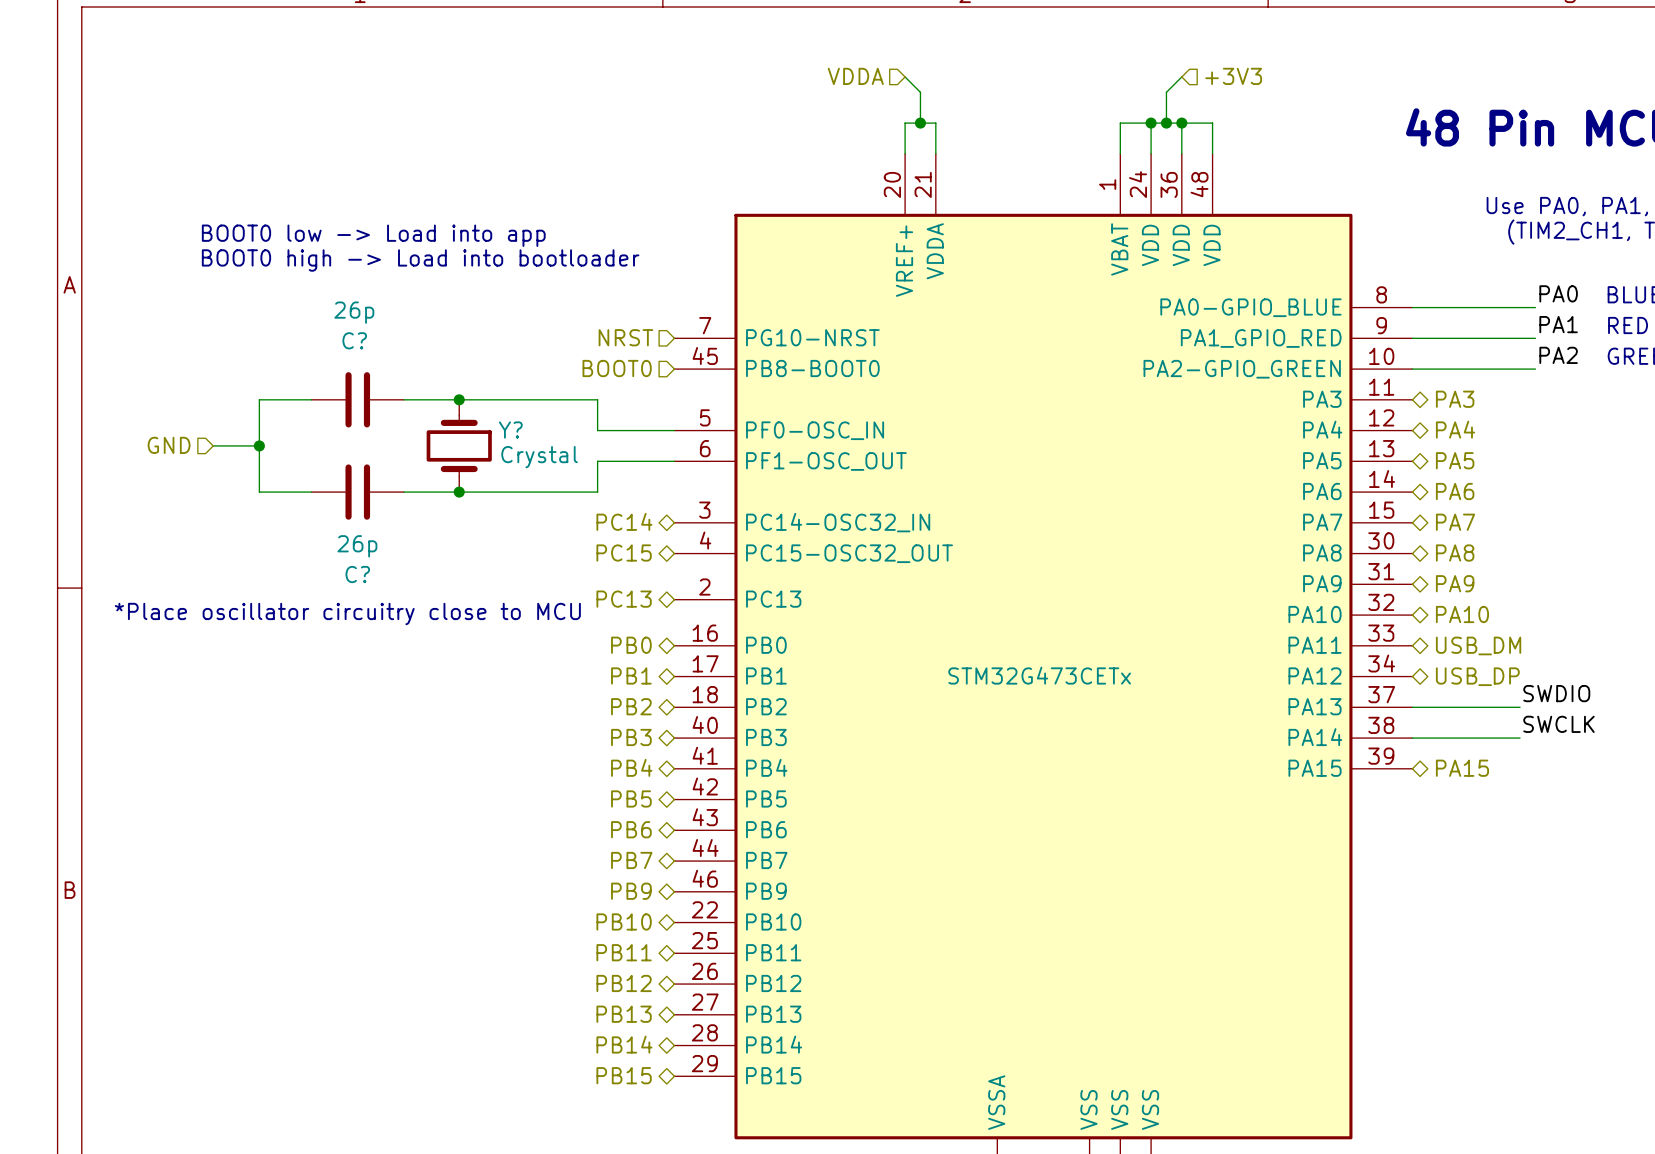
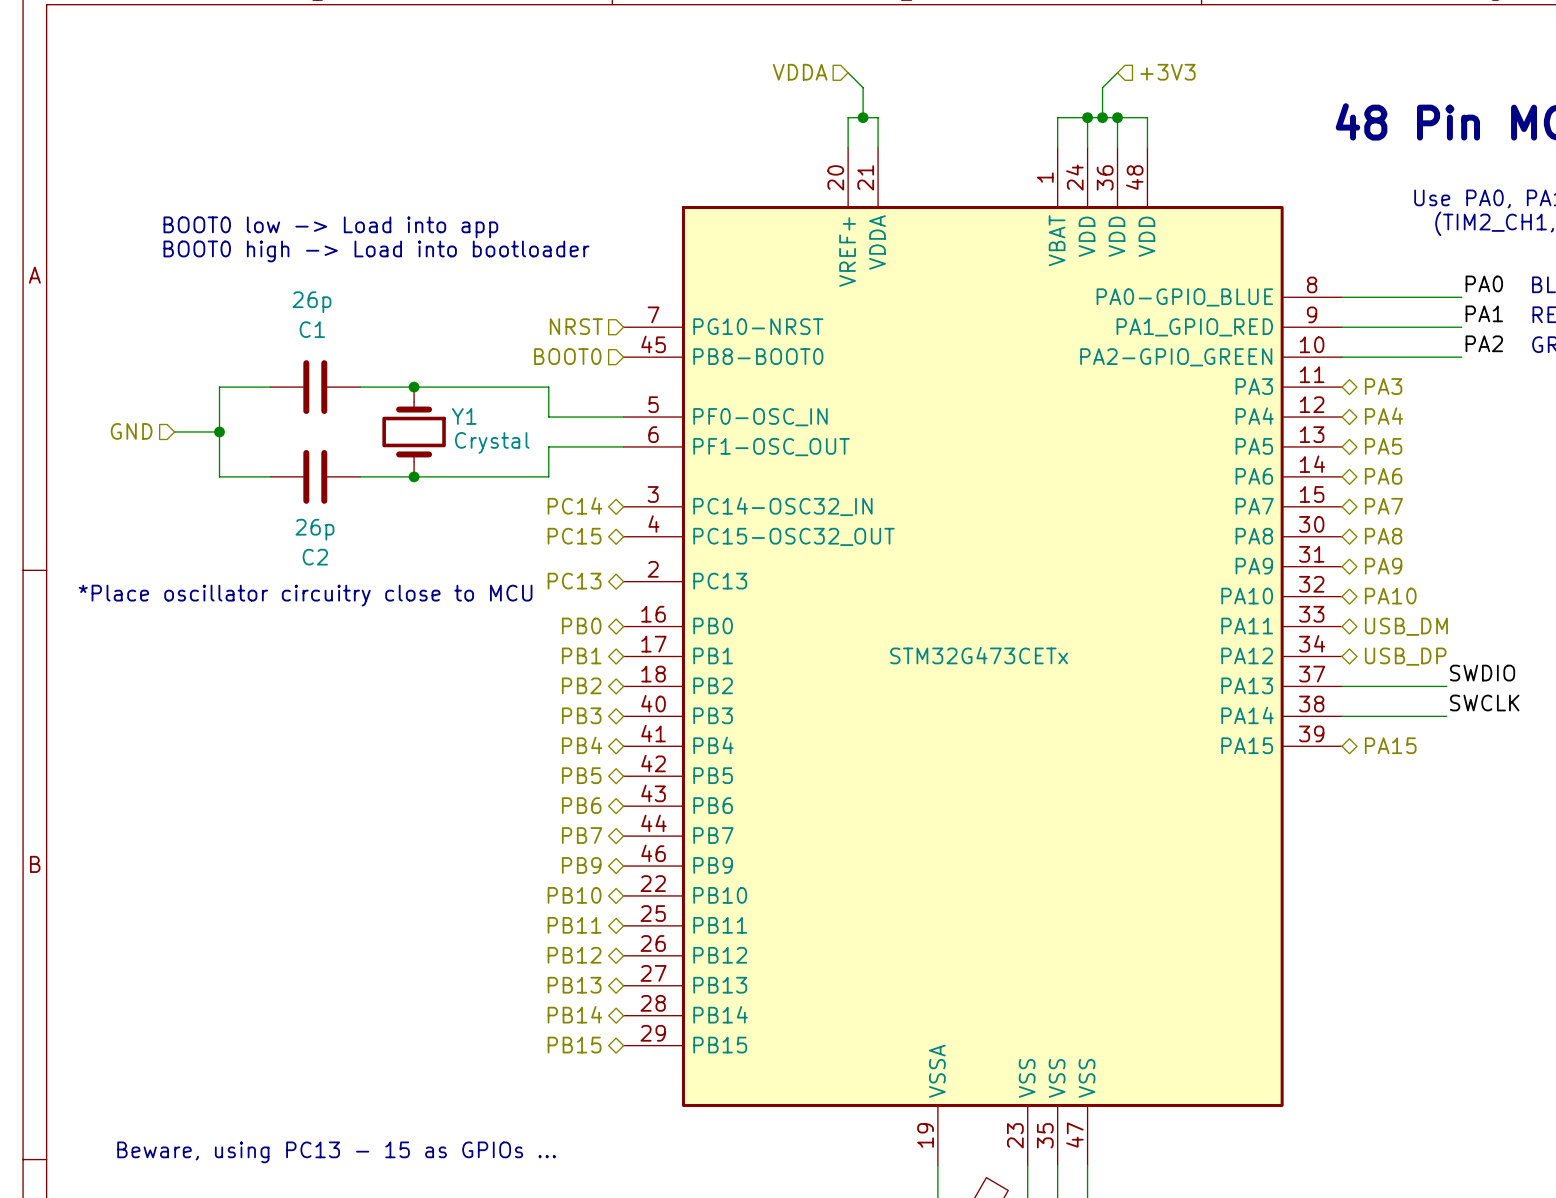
C? name: C? (354, 340) -> C1 (312, 329)
Y? name: Y? (510, 430) -> Y1 (464, 416)
C? name: C? (357, 574) -> C2 (315, 557)

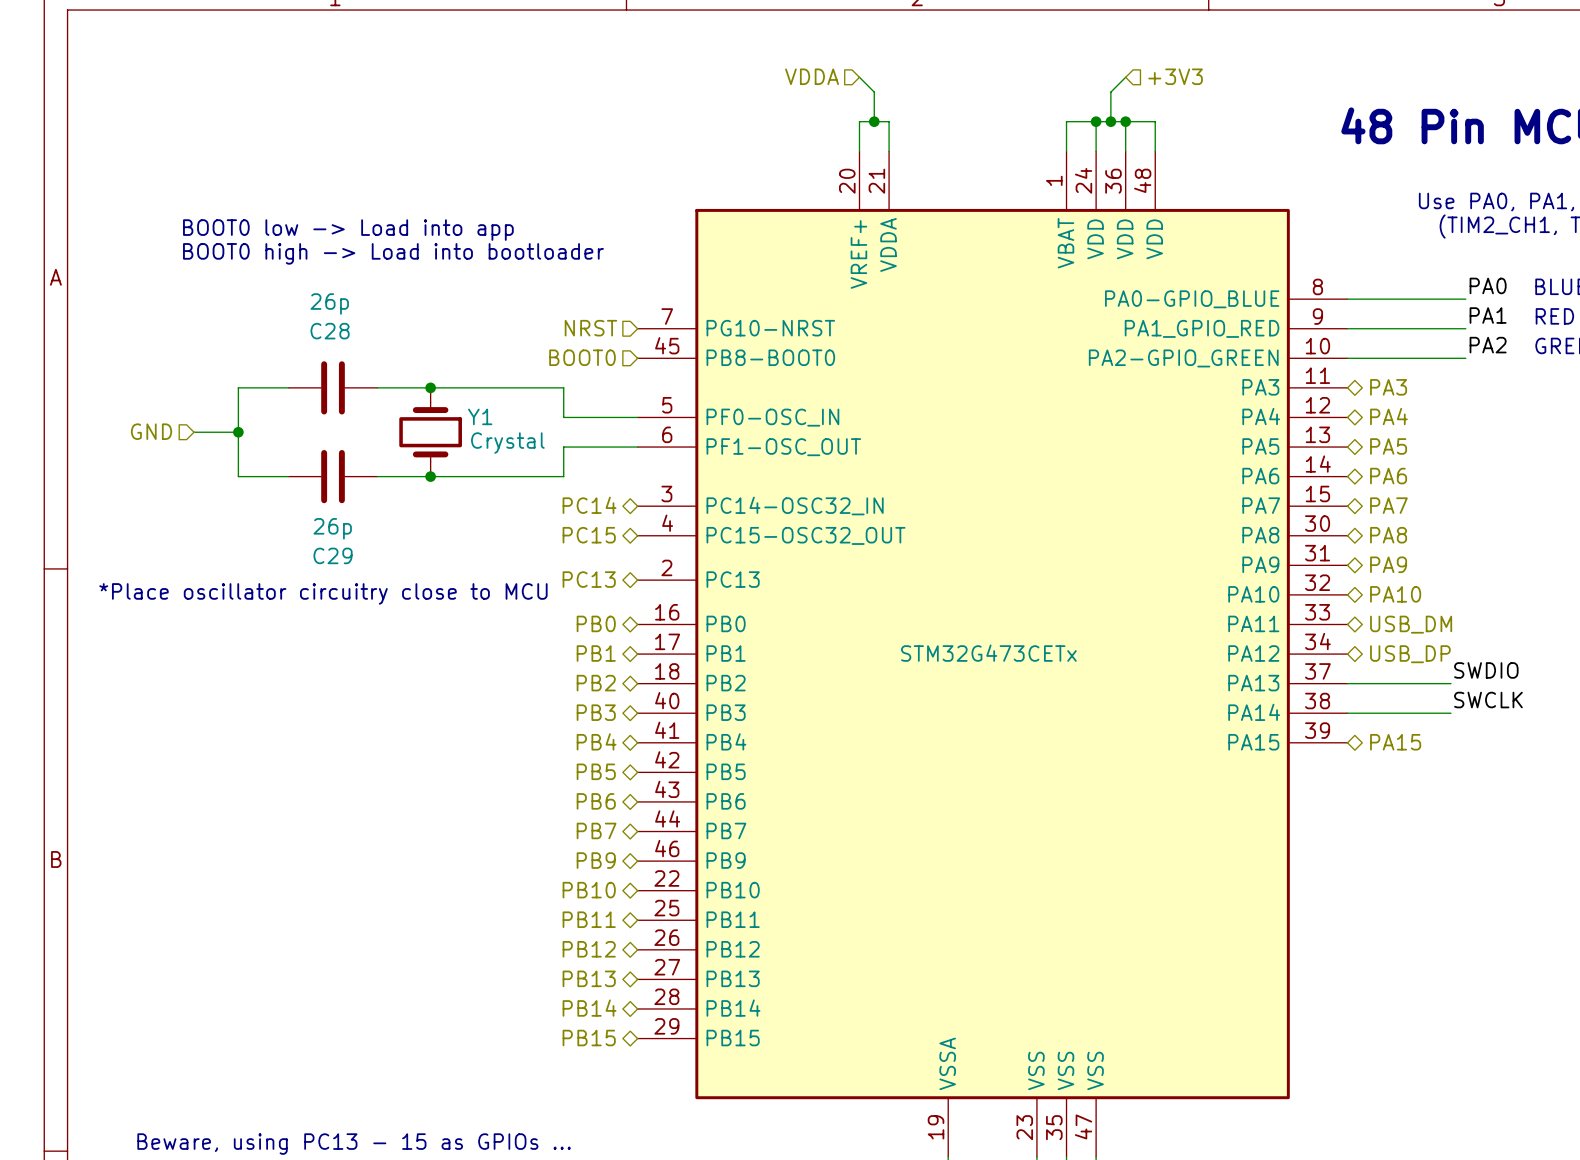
C1 name: C1 (312, 329) -> C28 (330, 331)
C2 name: C2 (315, 557) -> C29 (333, 555)

